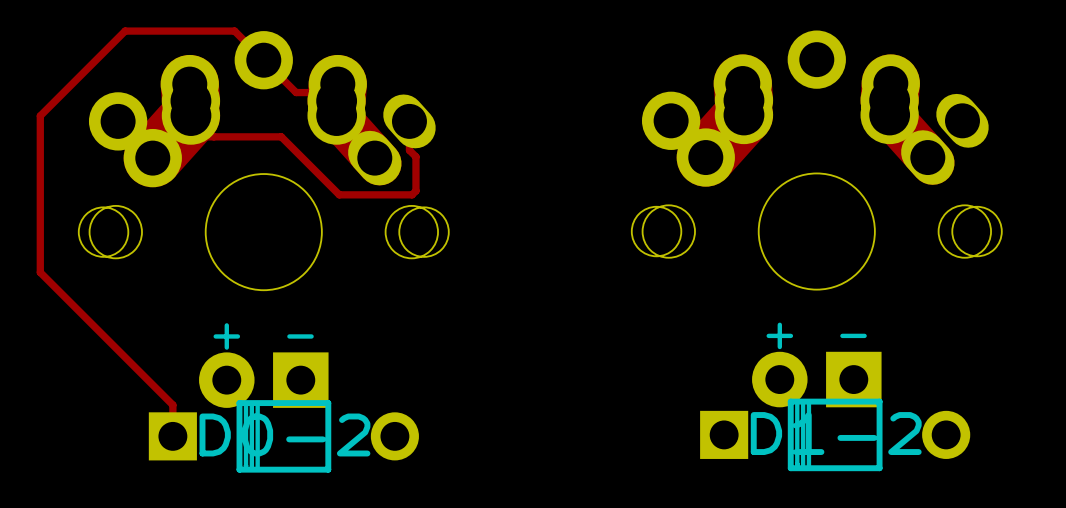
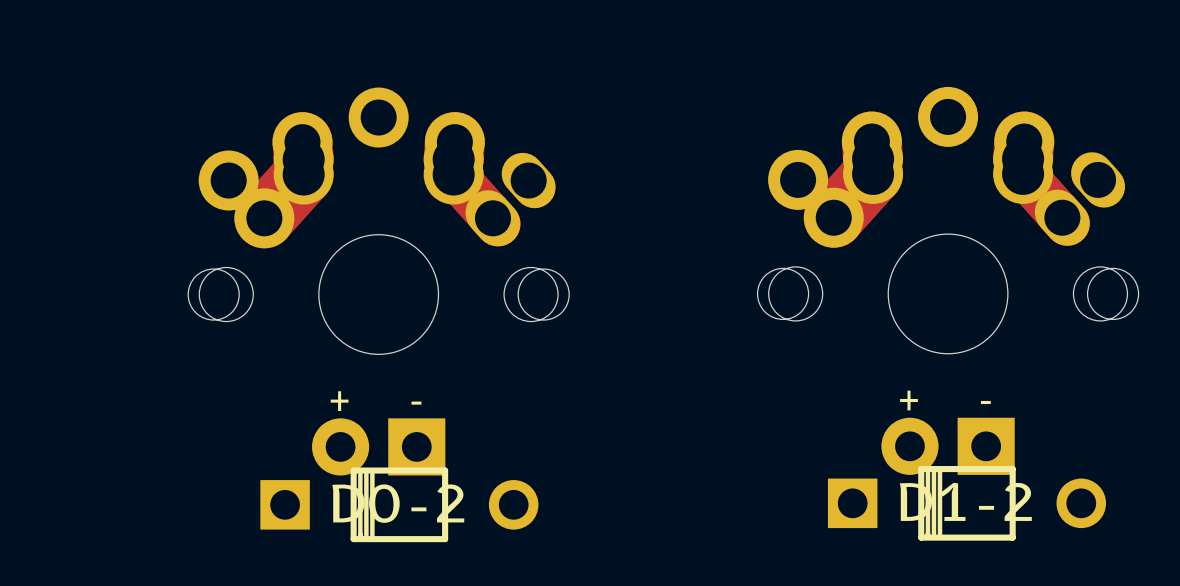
track: (337, 92) (296, 92) (234, 31) (125, 31) (40, 115) (40, 272) (172, 405) (172, 436) -> none
track: (409, 121) (409, 150) (415, 156) (415, 190) (412, 194) (339, 194) (281, 136) (171, 136) -> none

